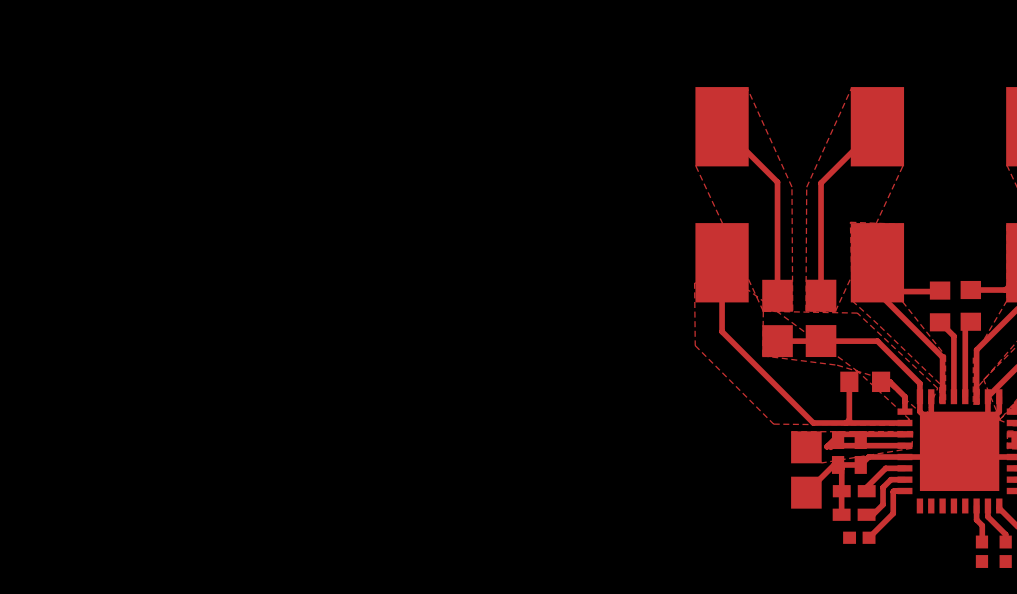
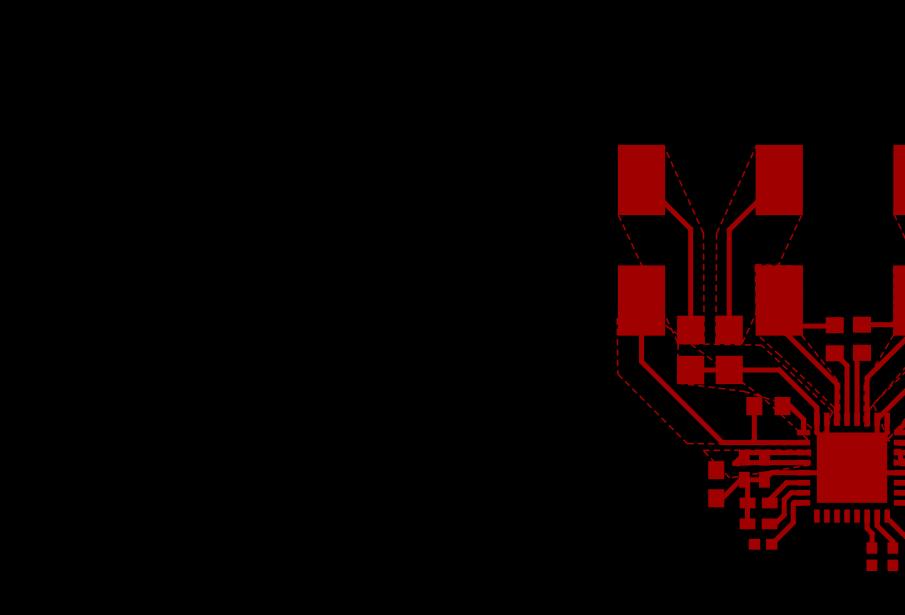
part footprint: [791, 431, 822, 509] -> [708, 461, 725, 508]

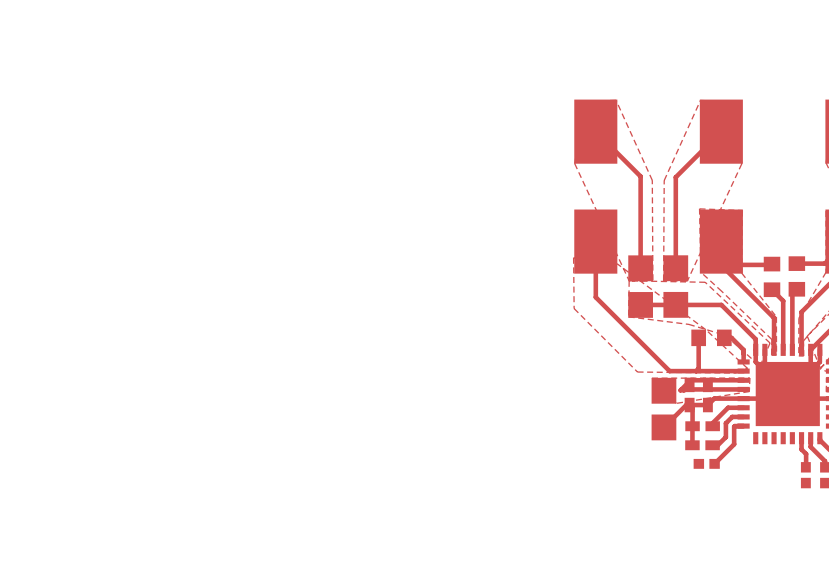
part footprint: [708, 461, 725, 508] -> [651, 377, 677, 441]

